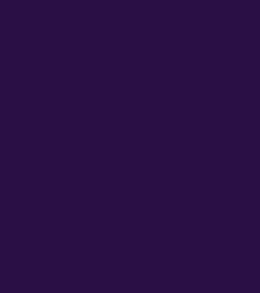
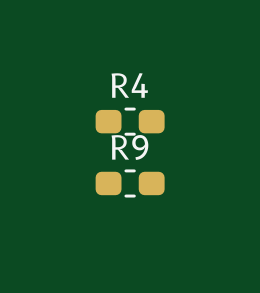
R4: none -> (130, 121)
R9: none -> (130, 183)

